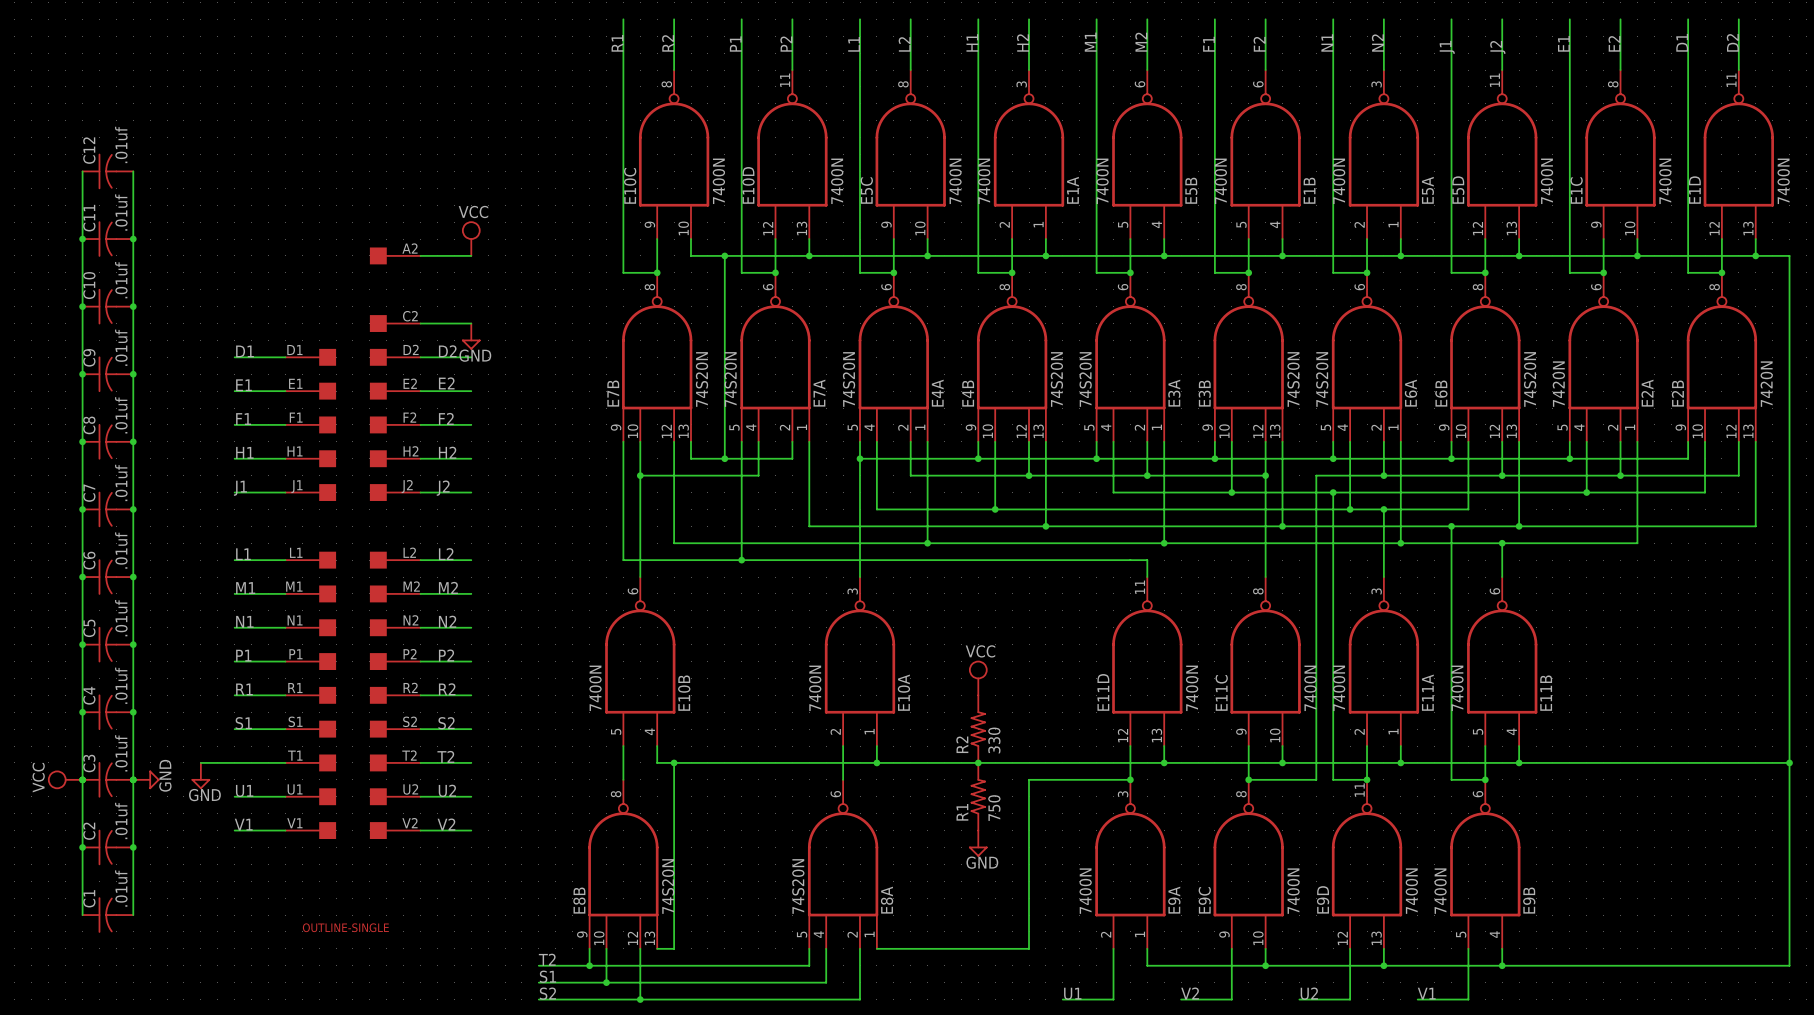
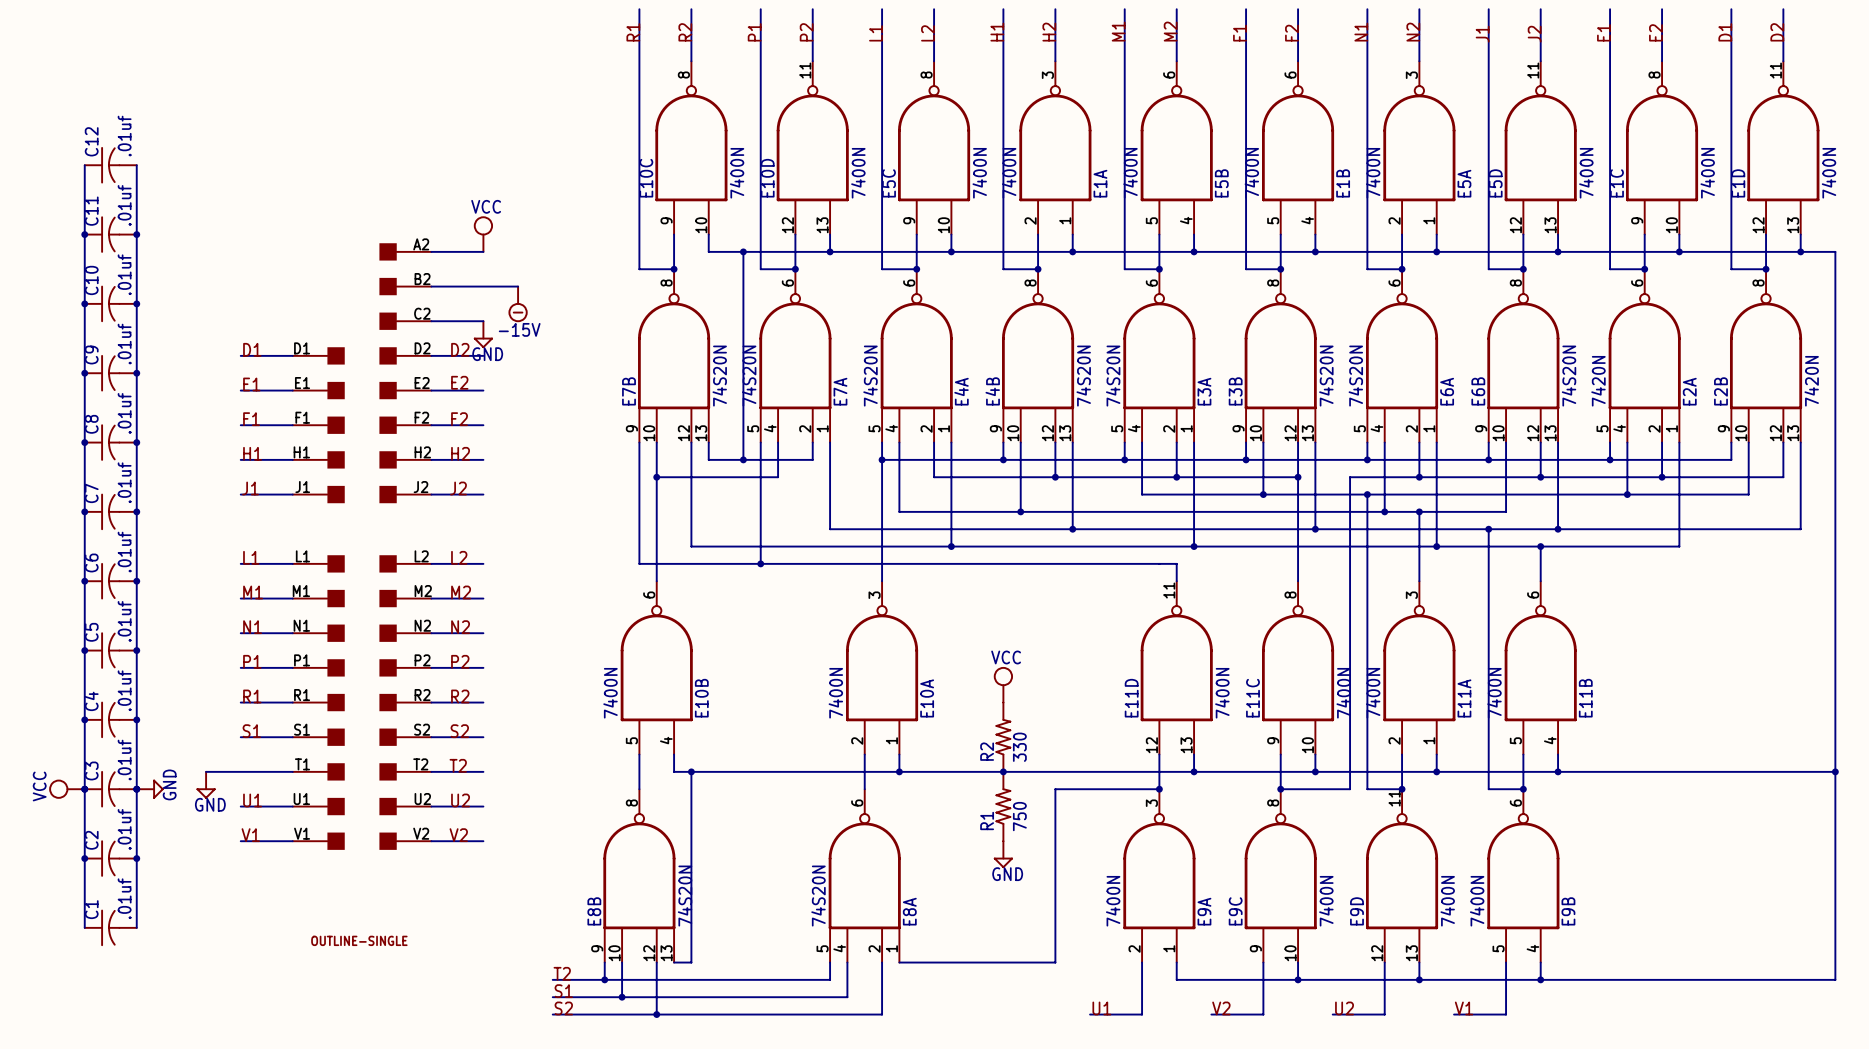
part: none -> (405, 286)
wire: none -> (431, 286) (518, 286)
power symbol: none -> -15V (518, 304)

